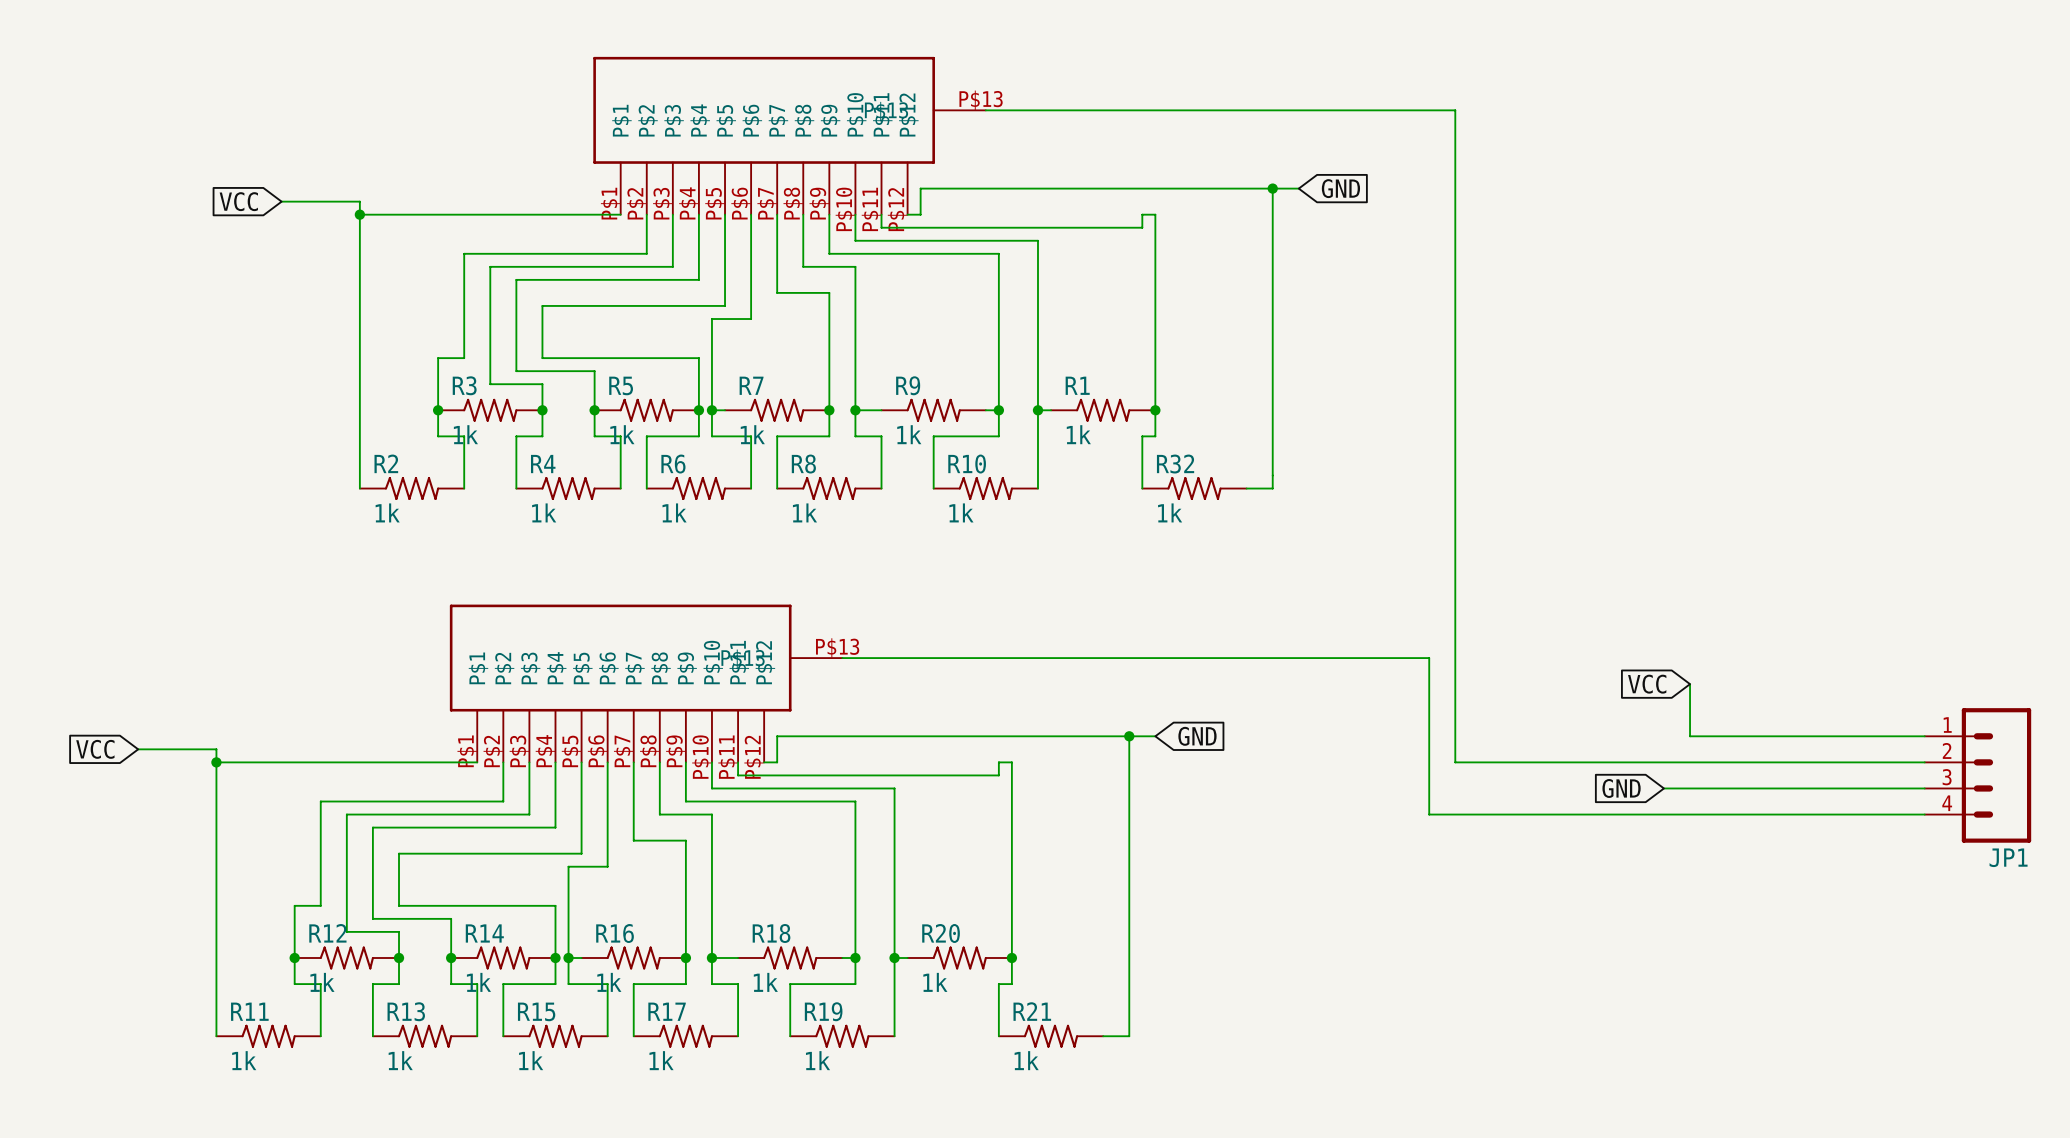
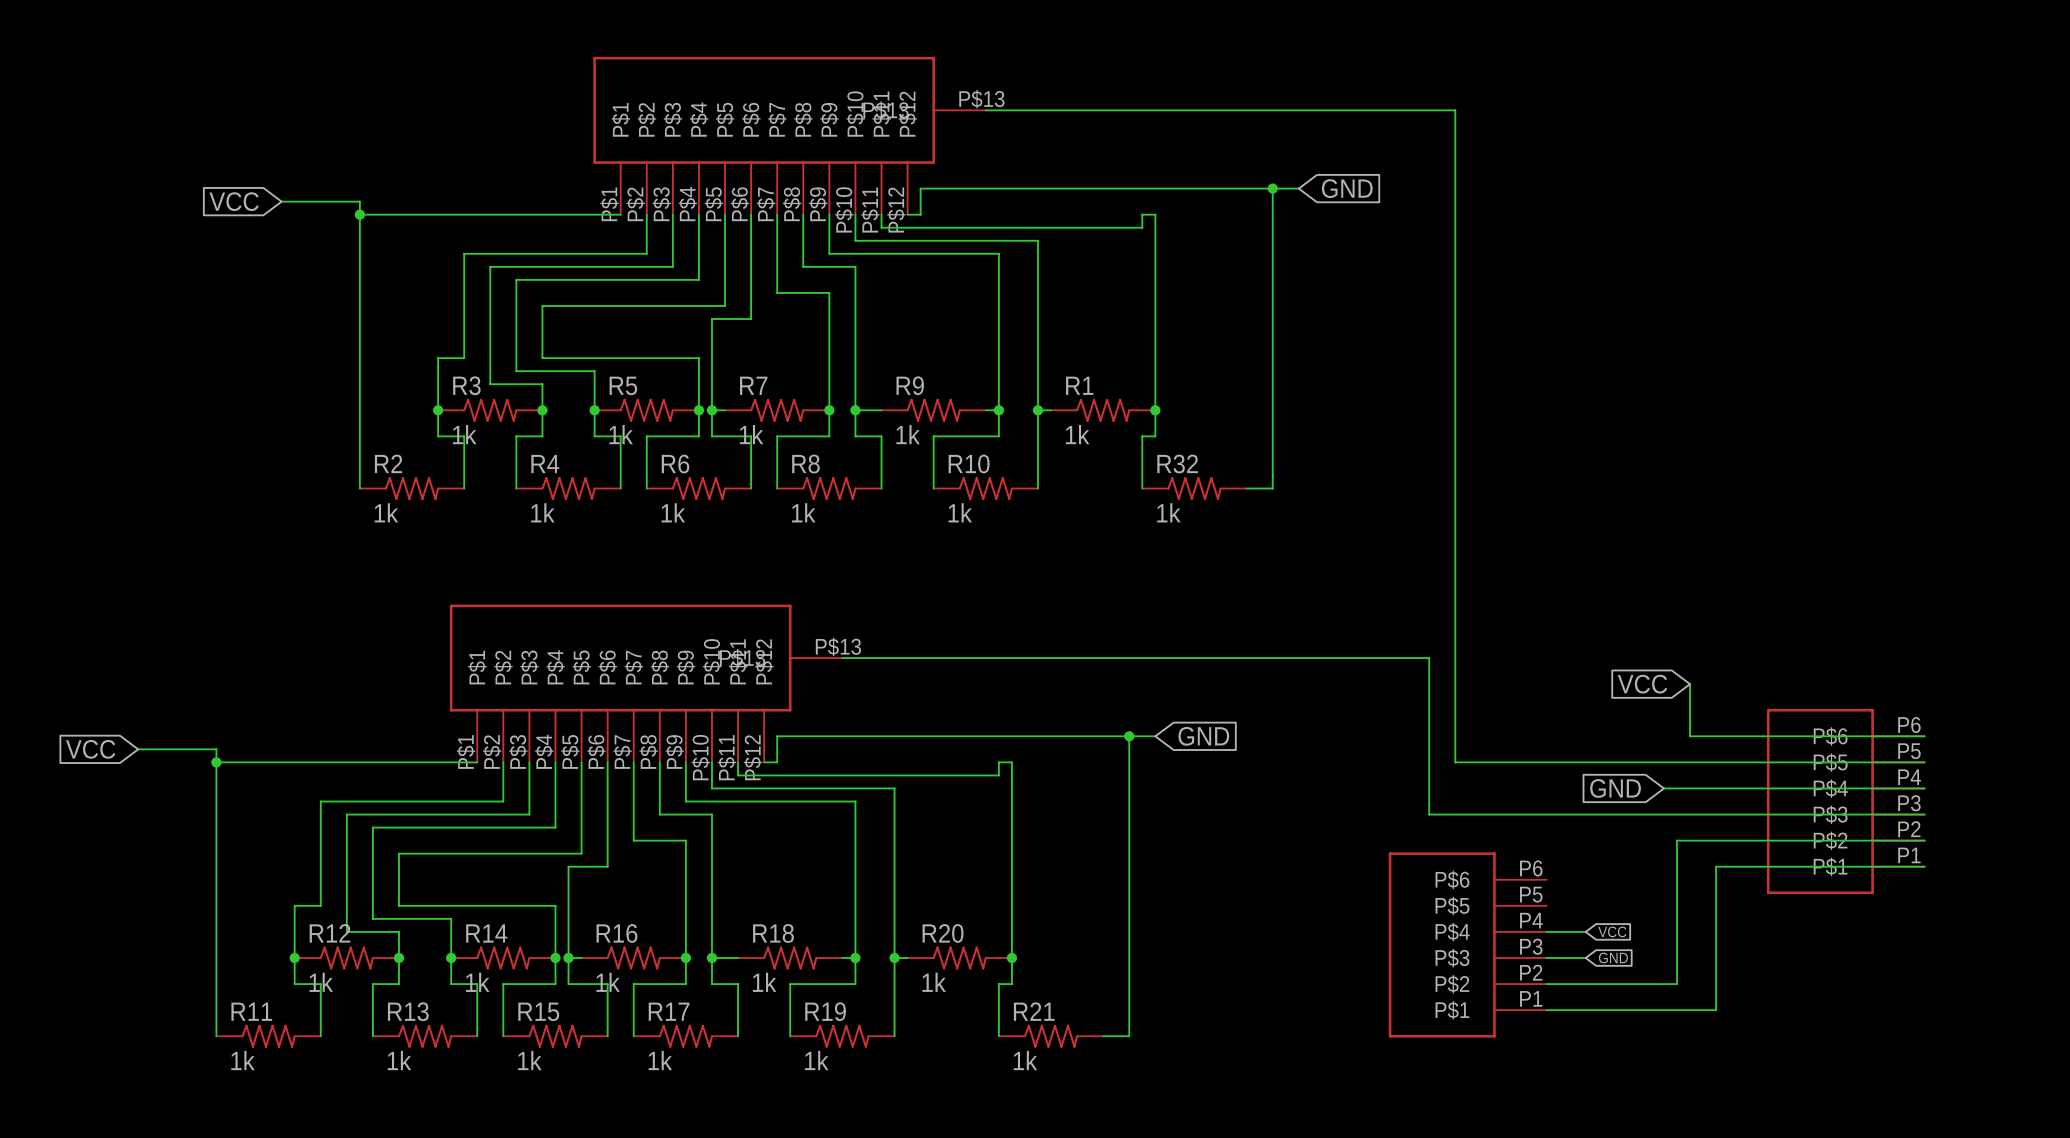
JP1: (1977, 775) -> none
part: none -> (1845, 801)
wire: none -> (1924, 840) (1676, 840) (1676, 984) (1546, 984)
wire: none -> (1924, 866) (1716, 866) (1716, 1010) (1546, 1010)
wire: none -> (1546, 931) (1585, 931)
global label: none -> VCC (1612, 931)
part: none -> (1467, 944)
wire: none -> (1546, 958) (1585, 958)
global label: none -> GND (1613, 957)

